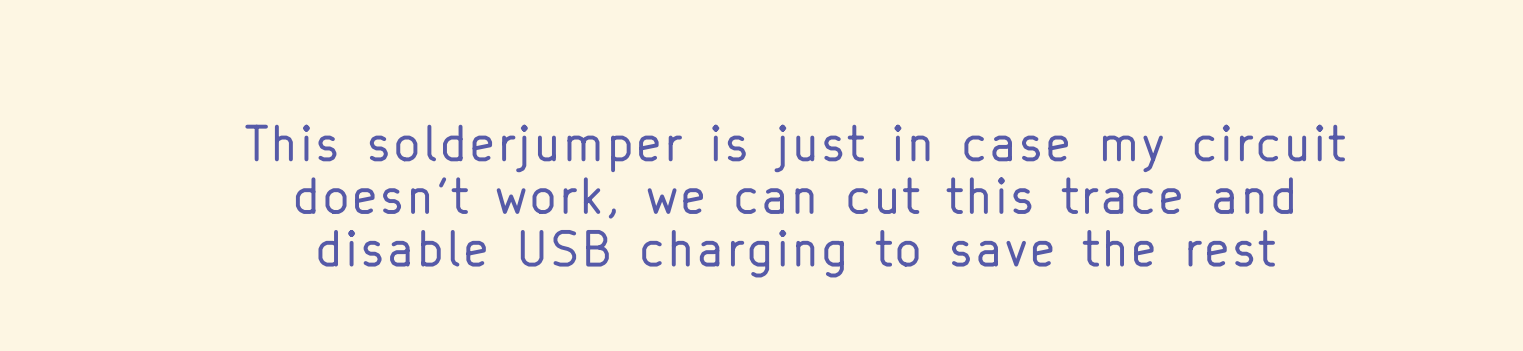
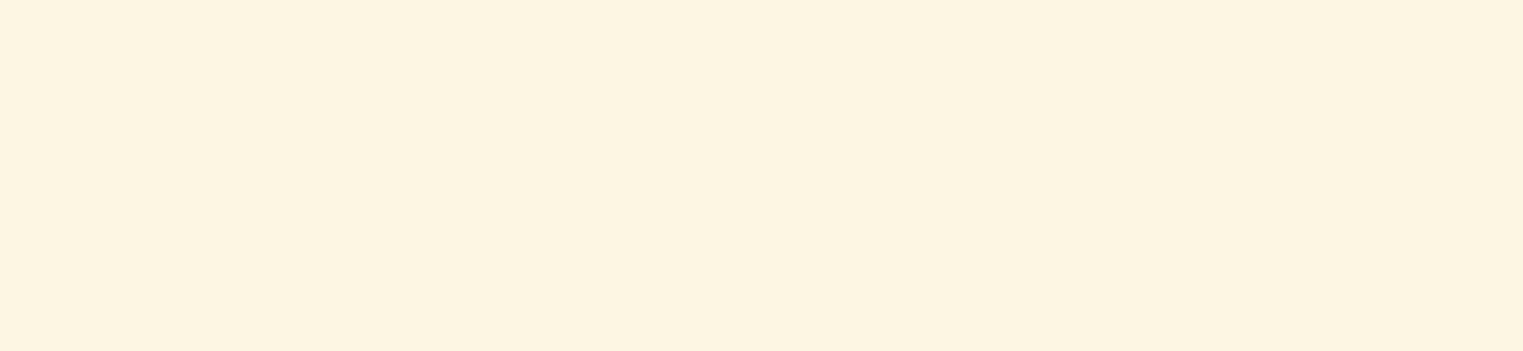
text: This solderjumper is just in case my circuit (795, 148) -> none
text: doesn't work, we can cut this trace and (794, 197) -> none
text: disable USB charging to save the rest (796, 253) -> none

